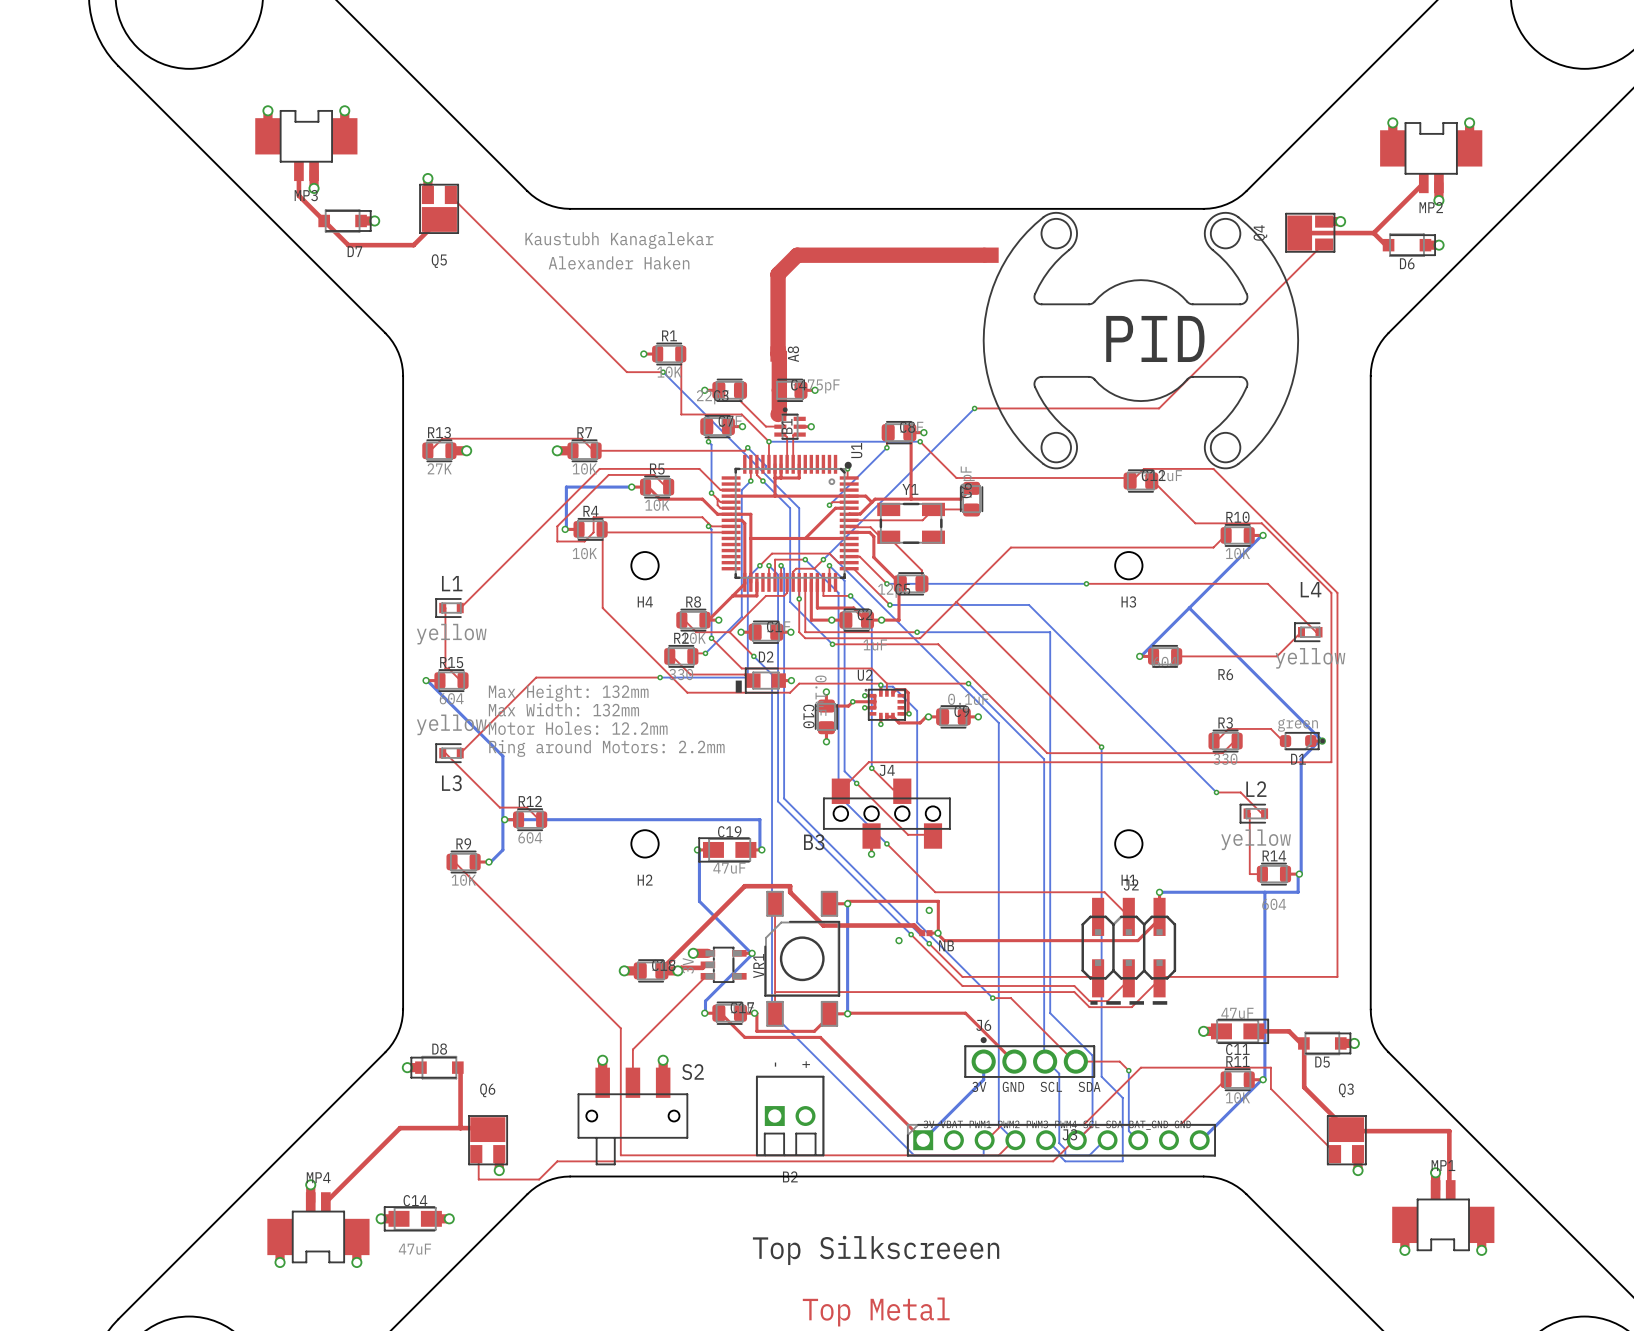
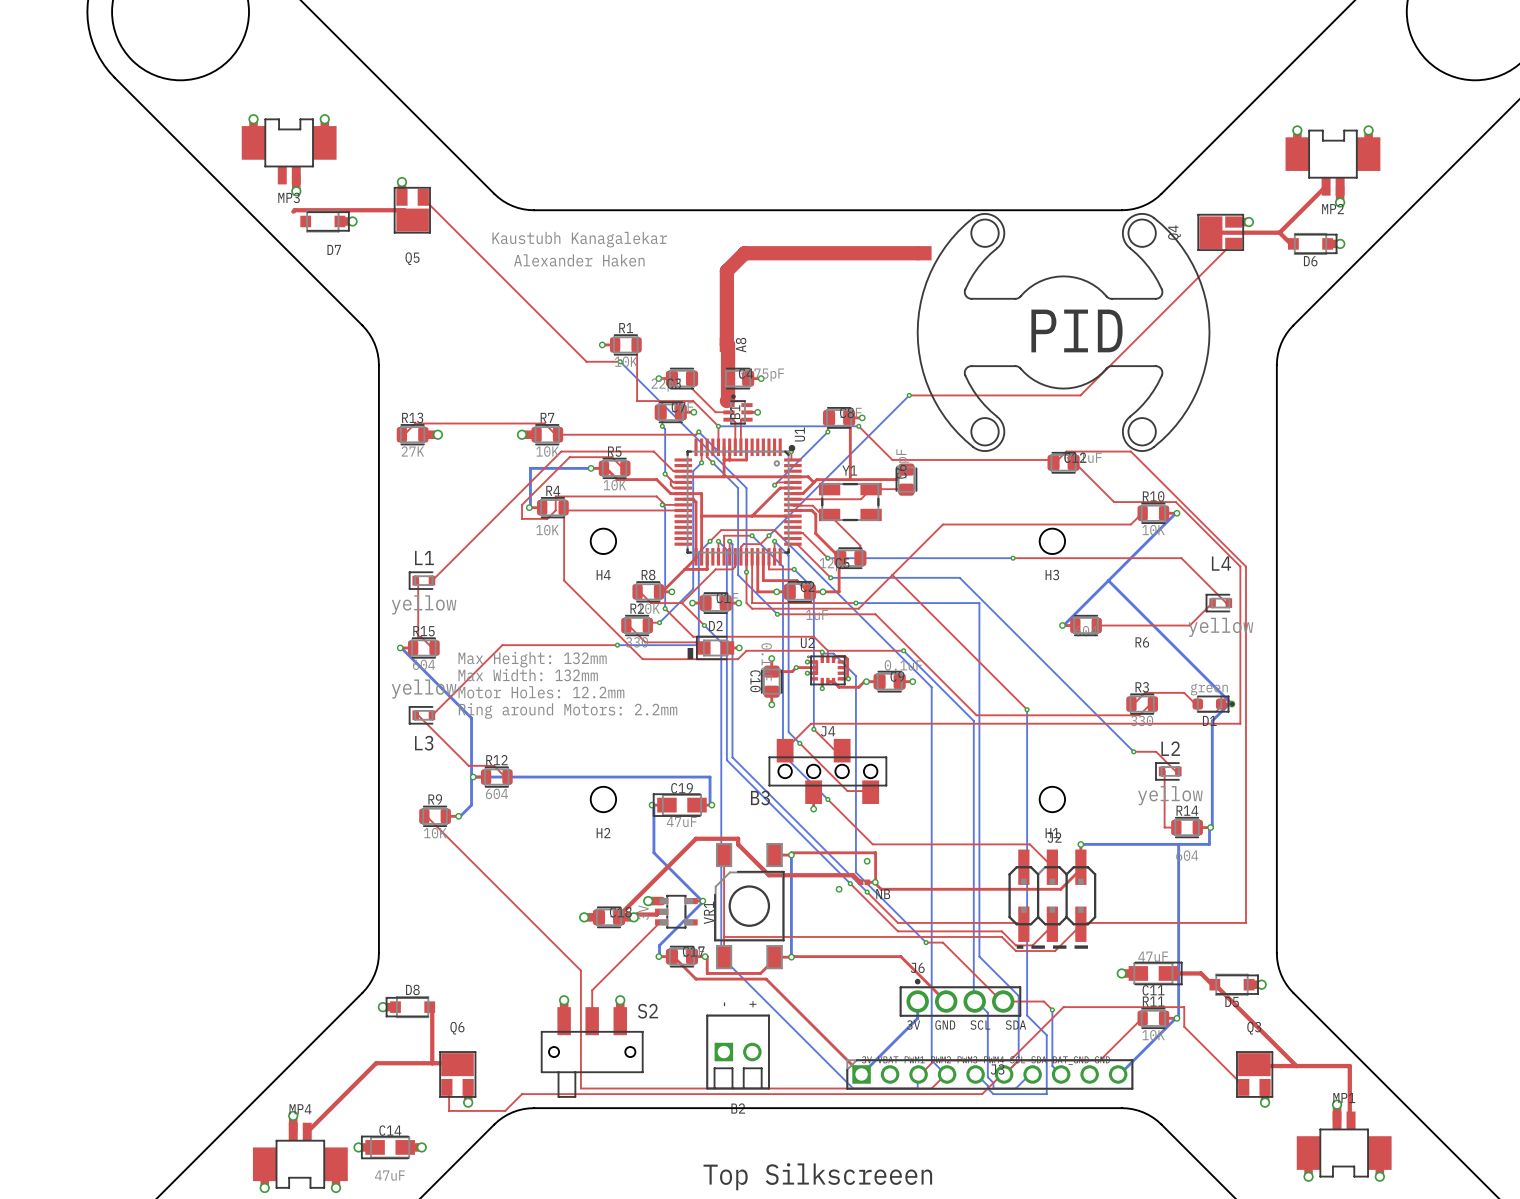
top track: (298, 171) (298, 195) (348, 245) (413, 245) (439, 219) -> (293, 211) (404, 210) (412, 220)
top track: (1304, 1043) (1304, 1087) (1346, 1129) -> (1215, 984) (1296, 1066)

